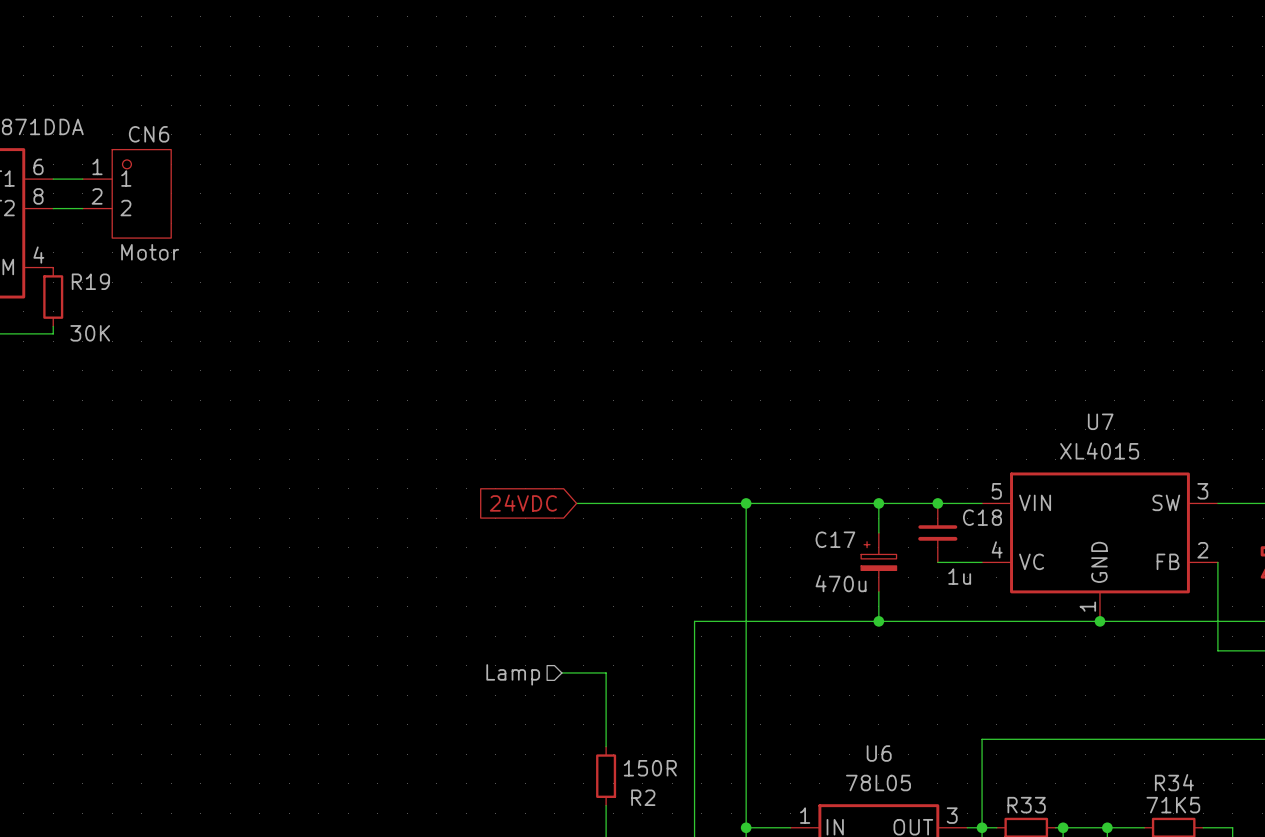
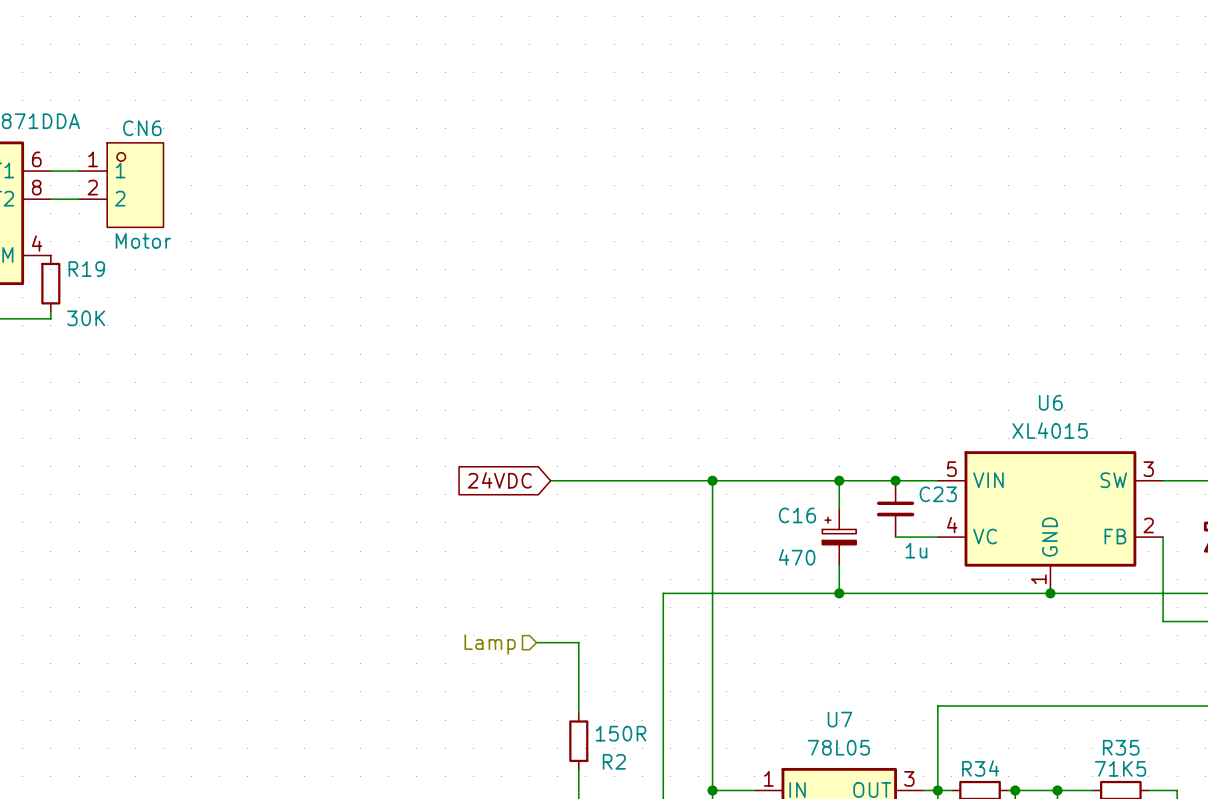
U7 name: U7 (1100, 421) -> U6 (1050, 402)
C18 name: C18 (982, 517) -> C23 (938, 494)
C17 name: C17 (835, 539) -> C16 (797, 515)
C17 value: 470u (841, 583) -> 470 (797, 557)
U6 name: U6 (879, 753) -> U7 (839, 719)
R34 name: R34 (1174, 782) -> R35 (1121, 747)
R33 name: R33 (1026, 805) -> R34 (980, 768)

